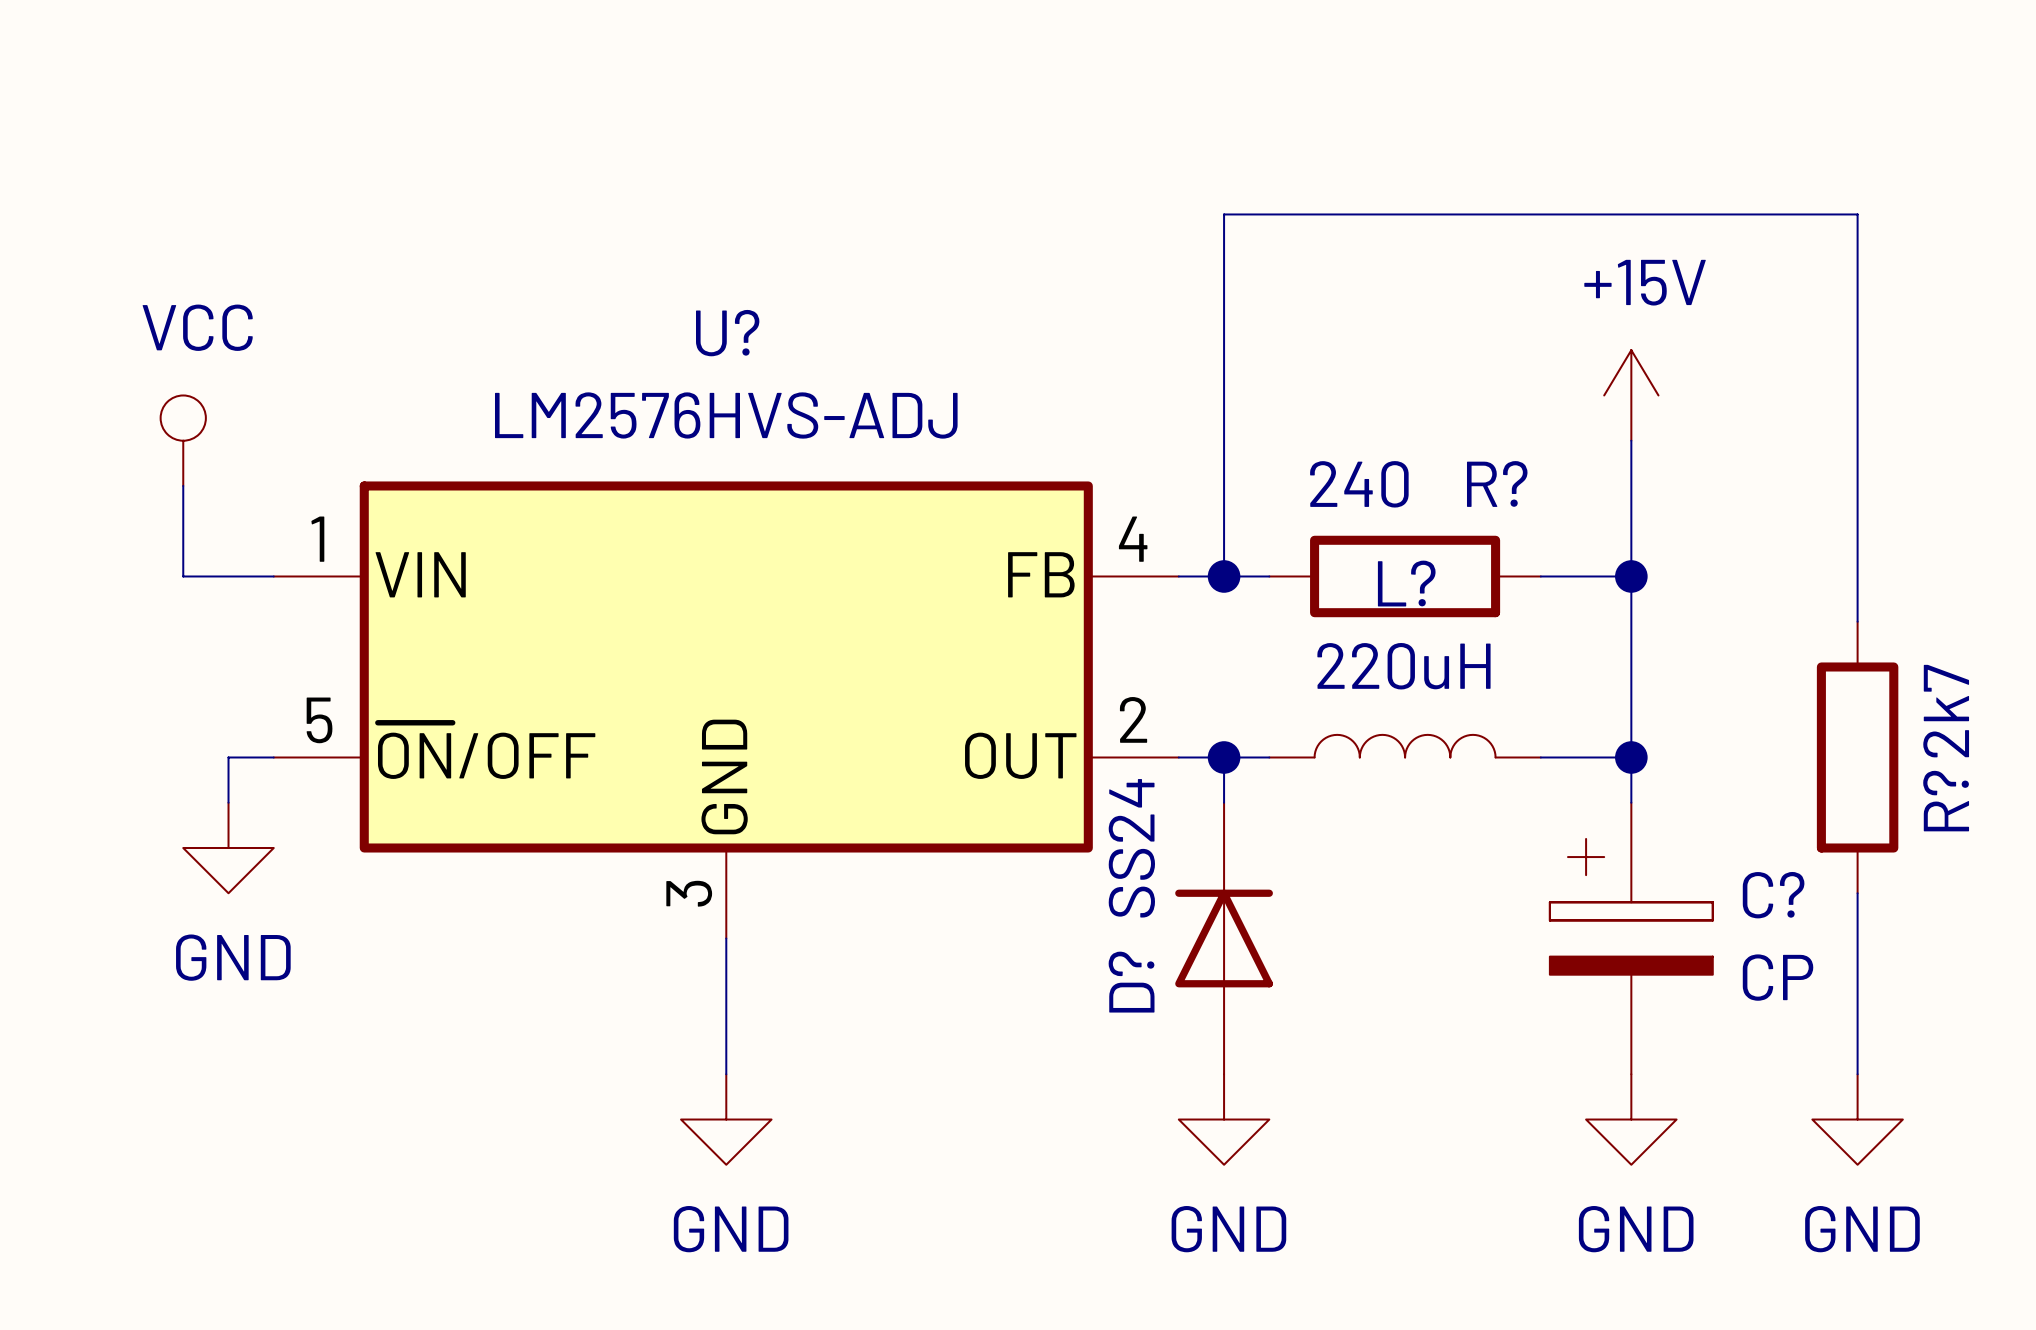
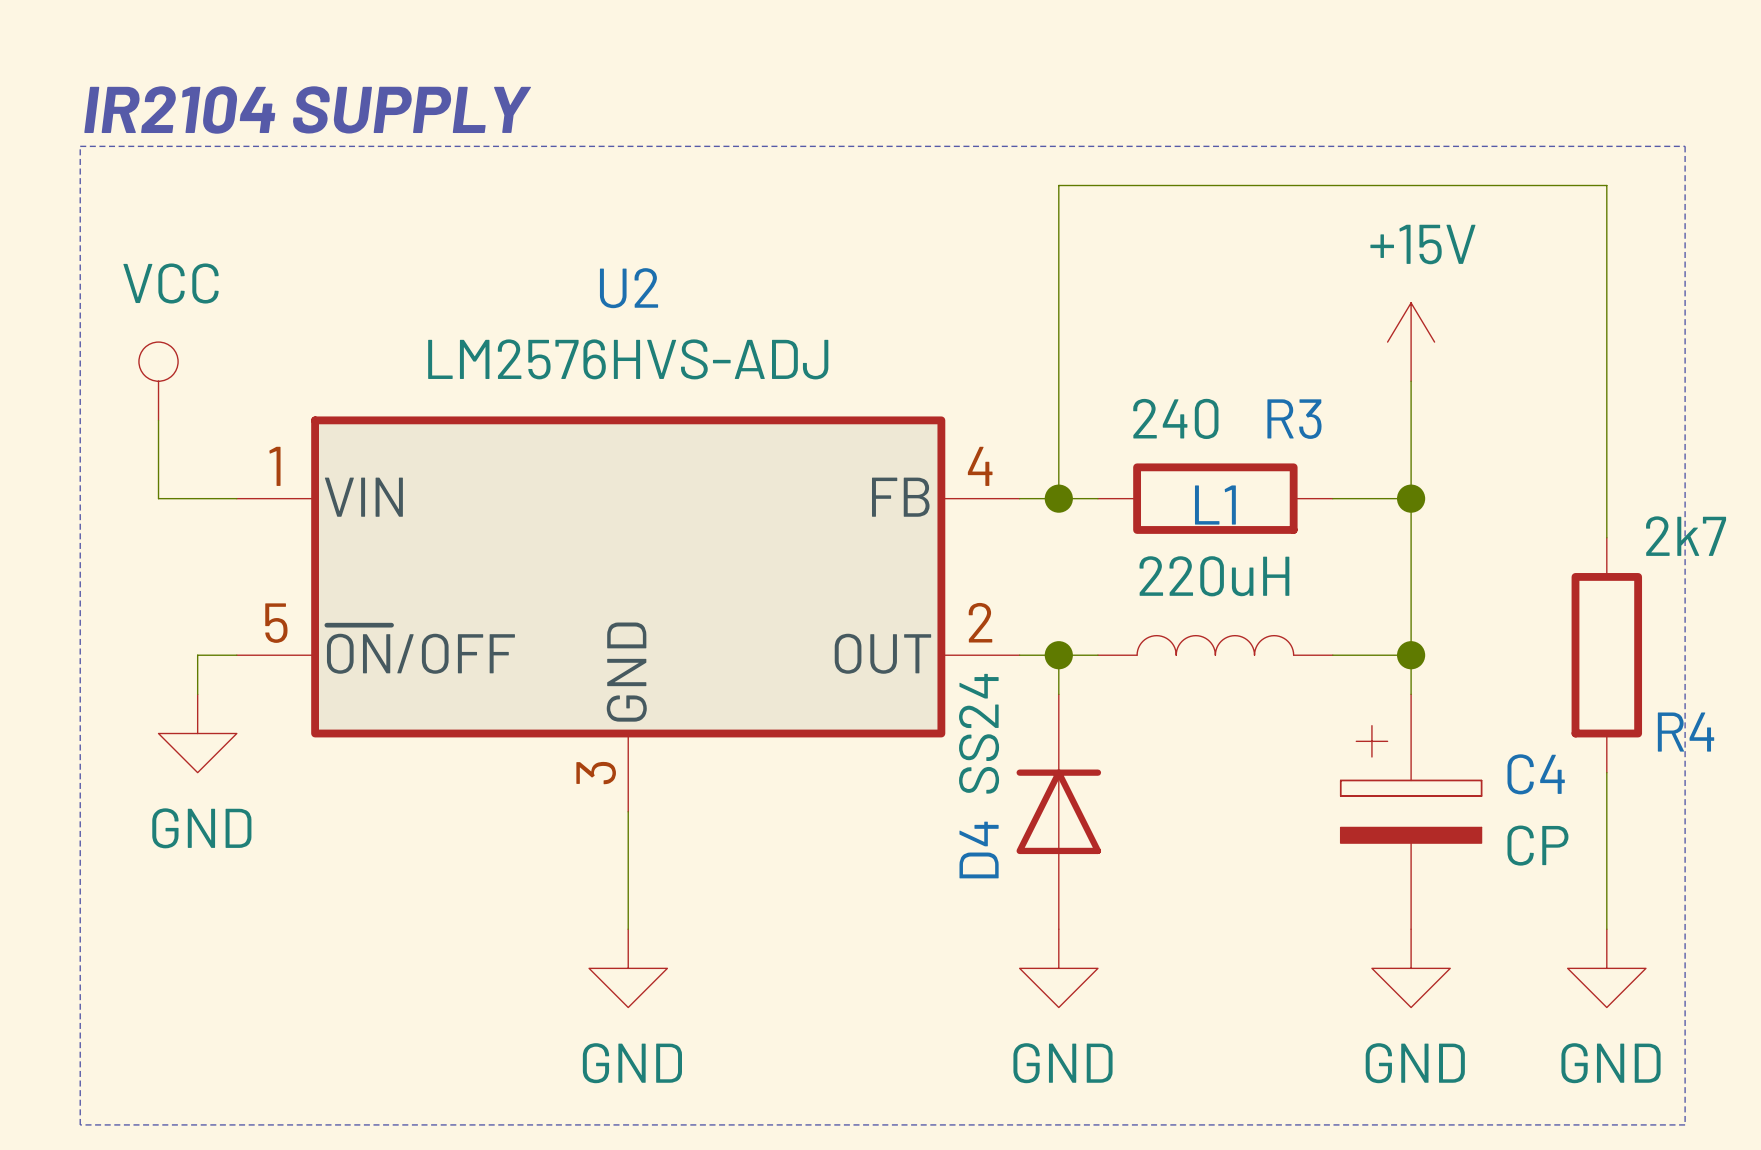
text: none -> IR2104 SUPPLY (307, 110)
line: none -> (80, 146) (1685, 146) (1685, 1124) (80, 1124) (80, 146)
U? name: U? (727, 333) -> U2 (629, 288)
R? name: R? (1497, 483) -> R3 (1294, 419)
L? name: L? (1406, 583) -> L1 (1215, 505)
R? value rotation: 0° (1946, 711) -> 90° clockwise (1686, 536)
R? name: R? (1946, 801) -> R4 (1686, 732)
C? name: C? (1773, 895) -> C4 (1536, 774)
D? name: D? (1131, 982) -> D4 (979, 850)

